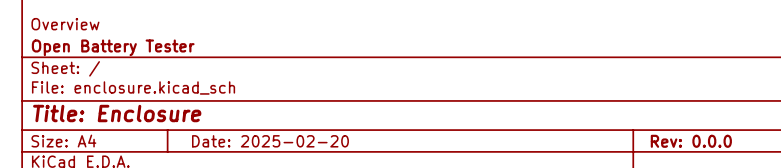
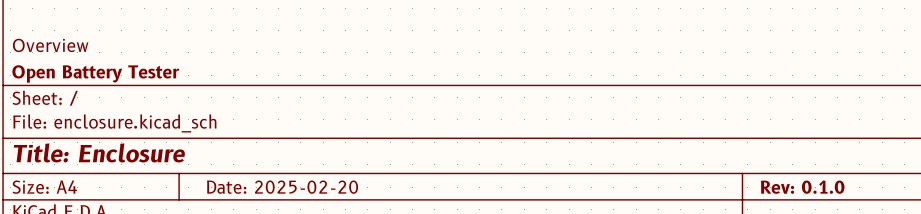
title block: Rev: 0.0.0 (691, 141) -> Rev: 0.1.0 (802, 187)

